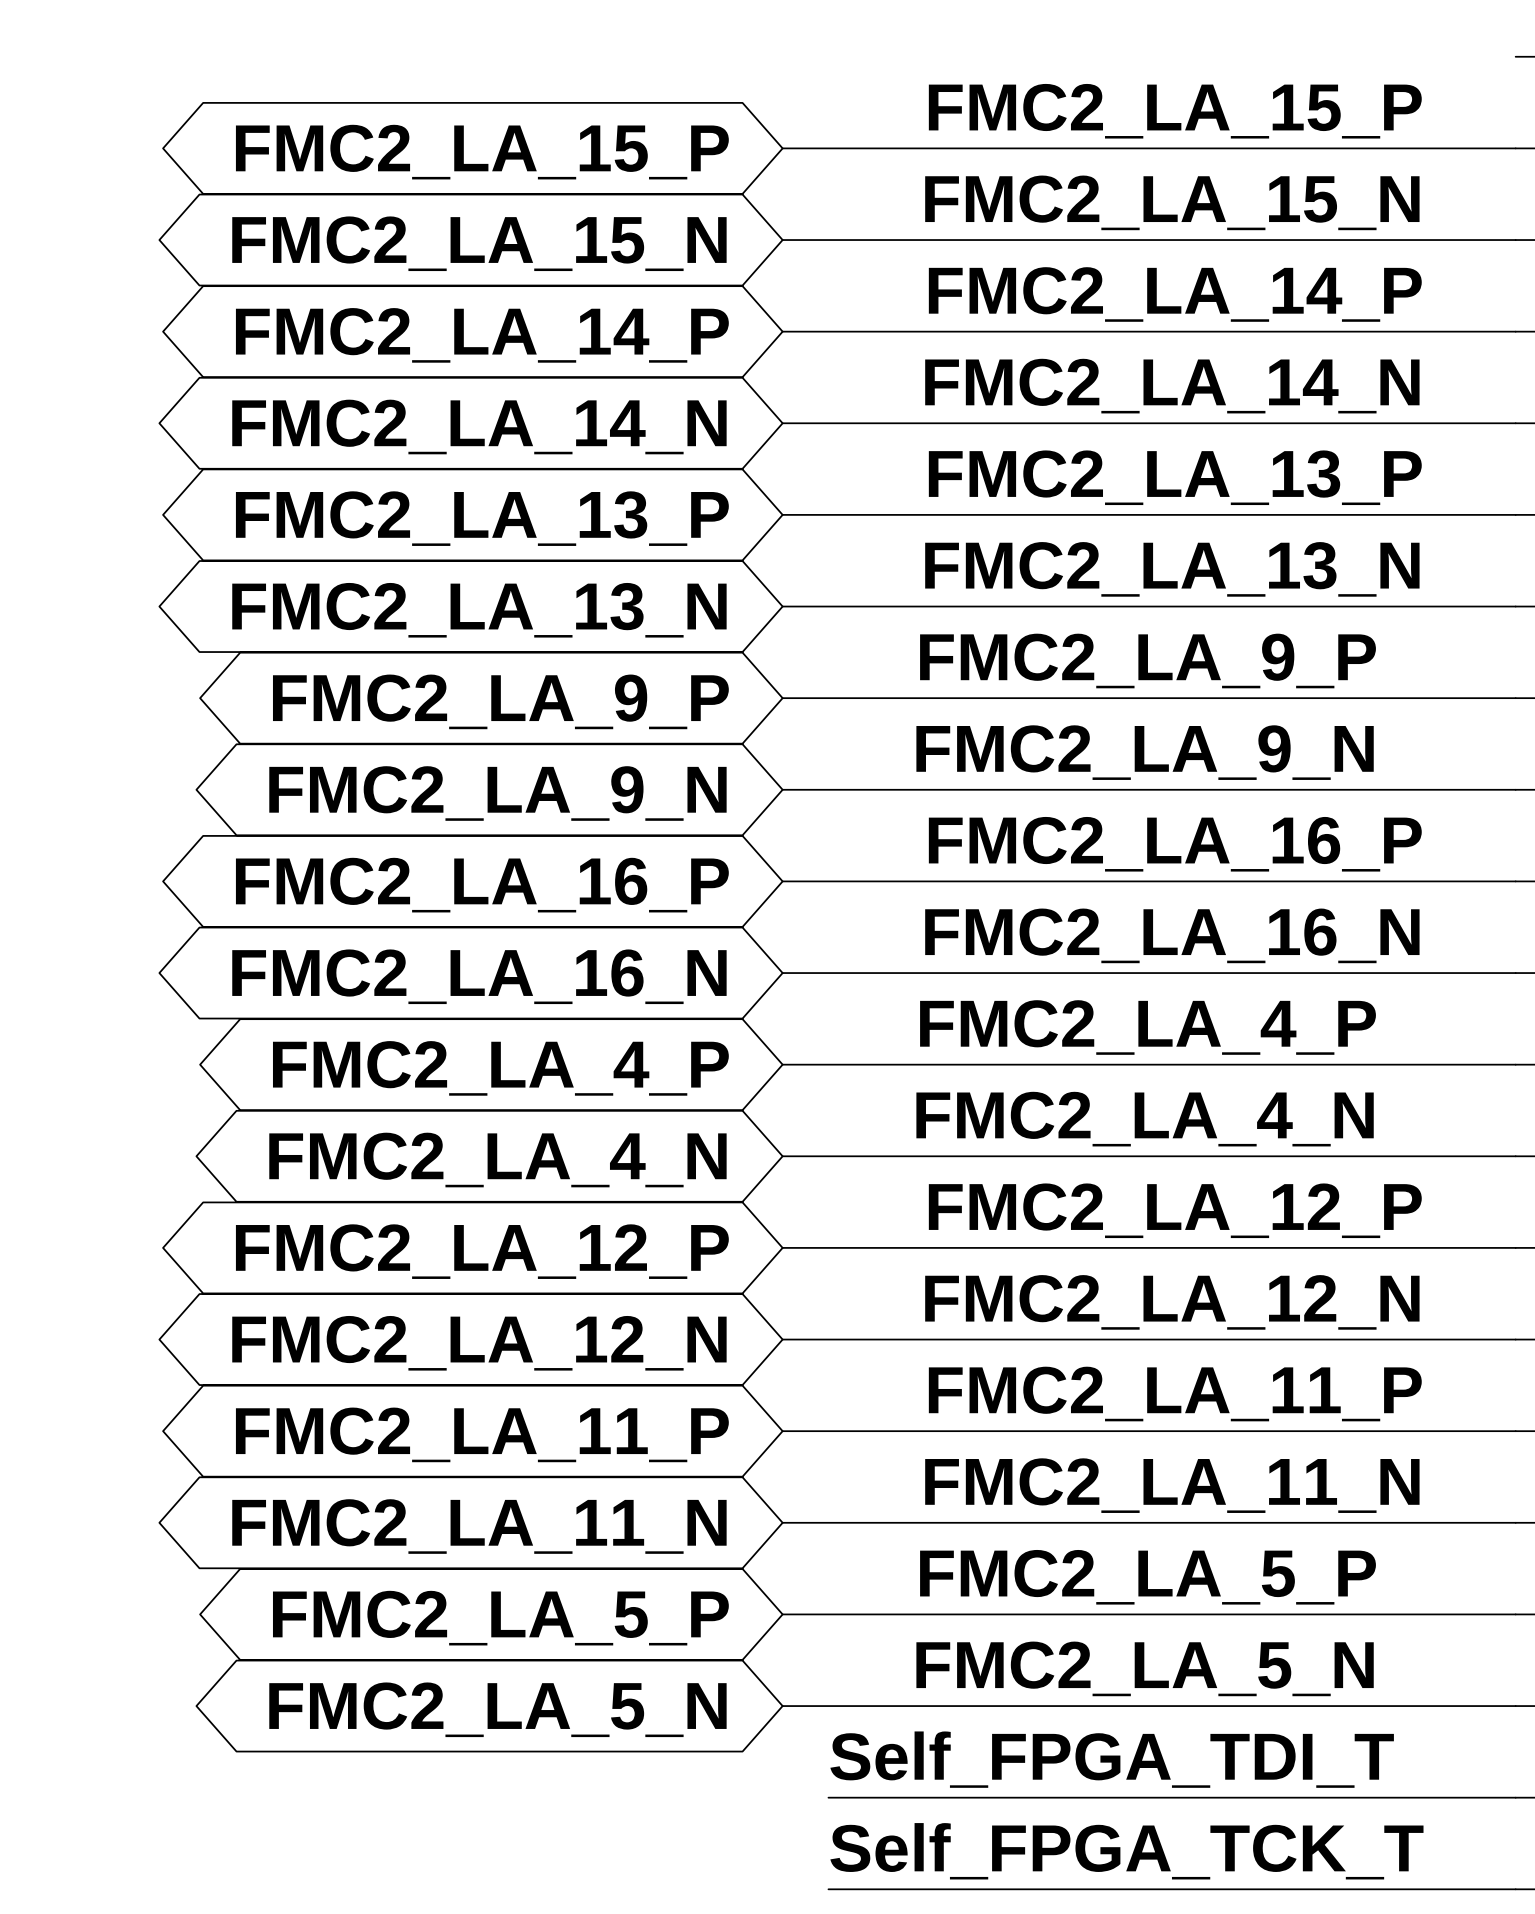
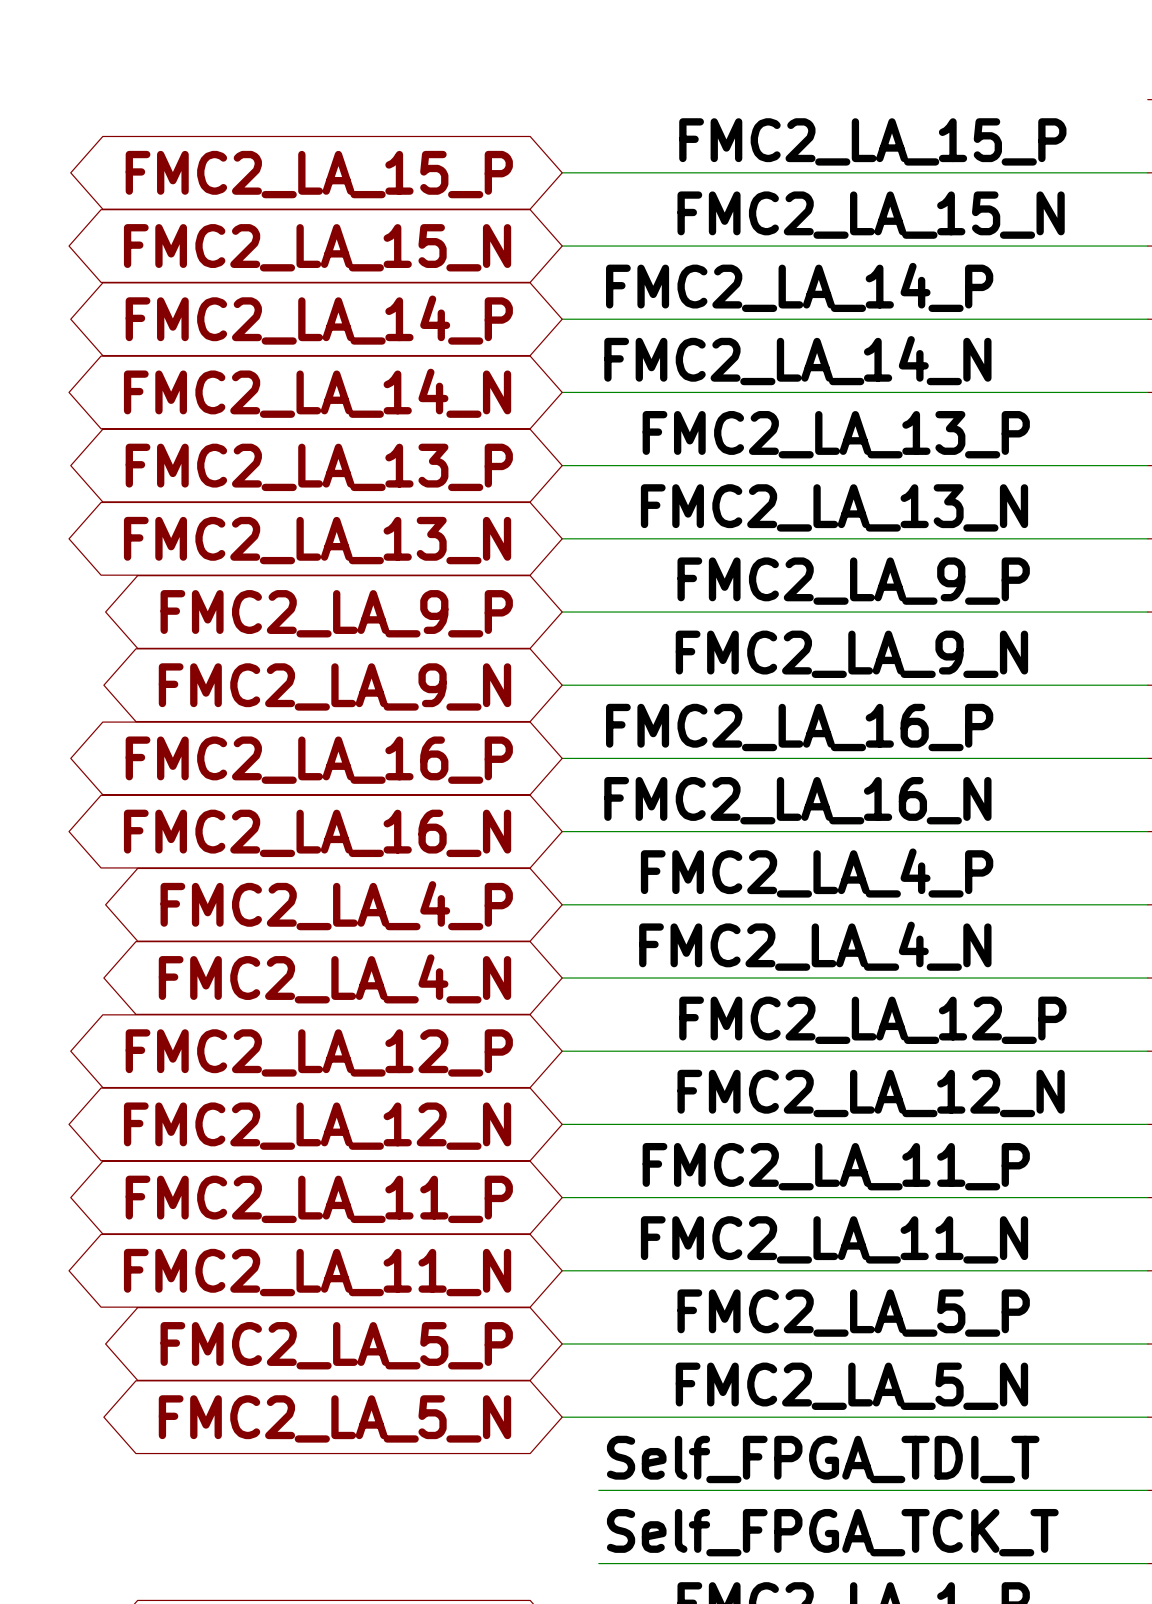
label position: FMC2_LA_14_P (1175, 294) -> FMC2_LA_14_P (799, 287)
label position: FMC2_LA_14_N (1172, 386) -> FMC2_LA_14_N (797, 360)
label position: FMC2_LA_13_P (1175, 477) -> FMC2_LA_13_P (836, 434)
label position: FMC2_LA_13_N (1172, 569) -> FMC2_LA_13_N (834, 507)
label position: FMC2_LA_16_P (1175, 844) -> FMC2_LA_16_P (799, 727)
label position: FMC2_LA_16_N (1172, 935) -> FMC2_LA_16_N (797, 800)
label position: FMC2_LA_4_P (1148, 1027) -> FMC2_LA_4_P (817, 873)
label position: FMC2_LA_4_N (1145, 1119) -> FMC2_LA_4_N (815, 946)
label position: FMC2_LA_11_P (1175, 1394) -> FMC2_LA_11_P (836, 1166)
label position: FMC2_LA_11_N (1172, 1485) -> FMC2_LA_11_N (834, 1239)

